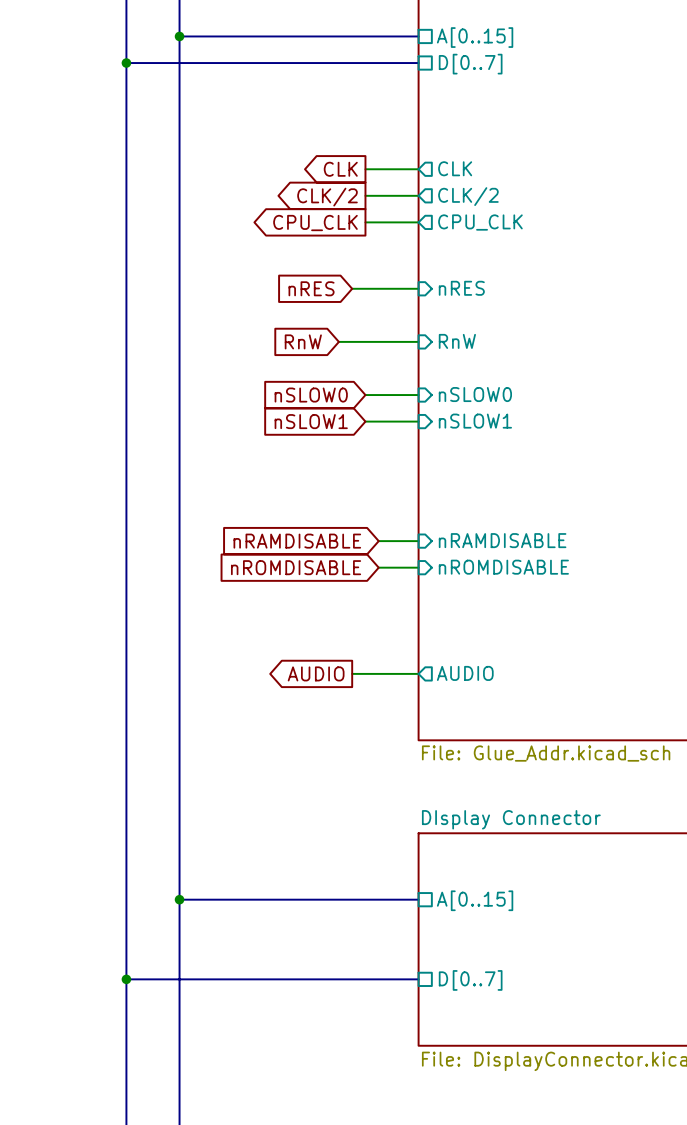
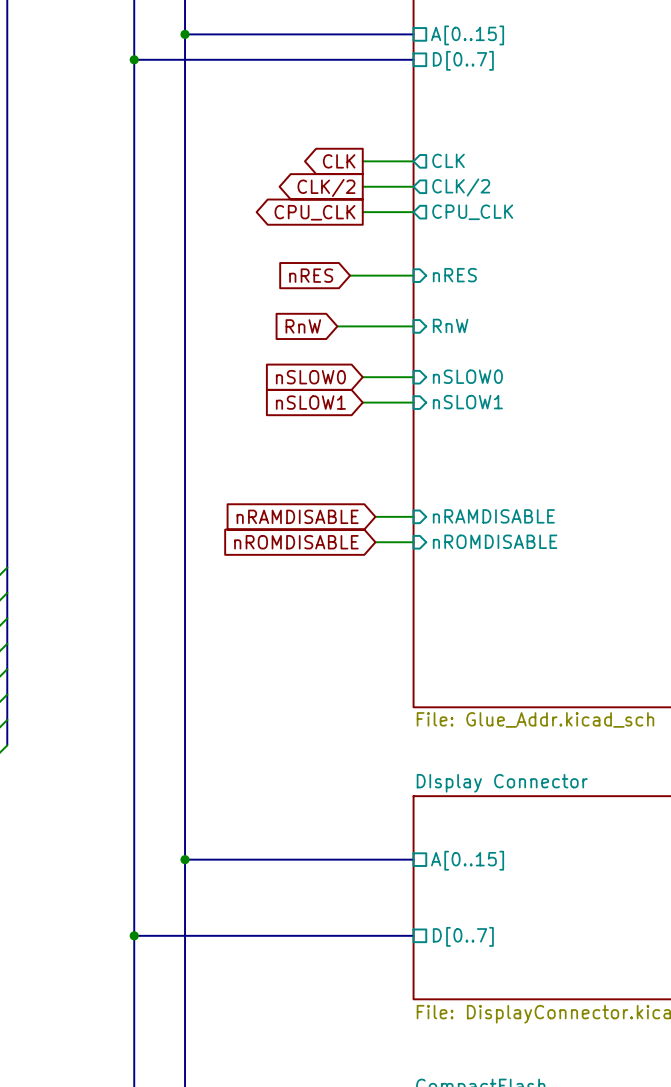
global label: AUDIO (316, 673) -> none
wire: (352, 673) (418, 673) -> none
sheet pin: AUDIO (465, 673) -> none

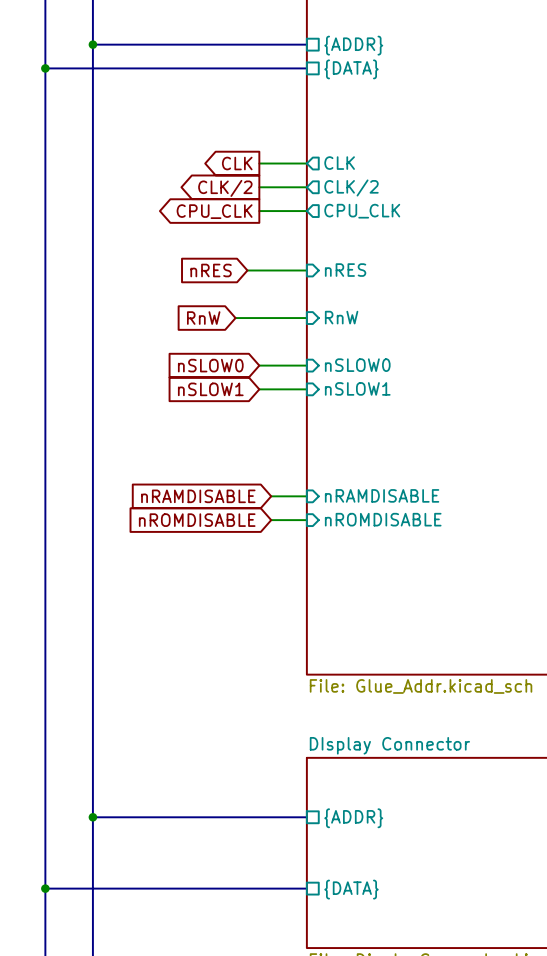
sheet pin: A[0..15] (467, 35) -> {ADDR} (353, 45)
sheet pin: D[0..7] (463, 60) -> {DATA} (351, 69)
sheet pin: A[0..15] (467, 860) -> {ADDR} (353, 818)
sheet pin: D[0..7] (463, 936) -> {DATA} (351, 889)

